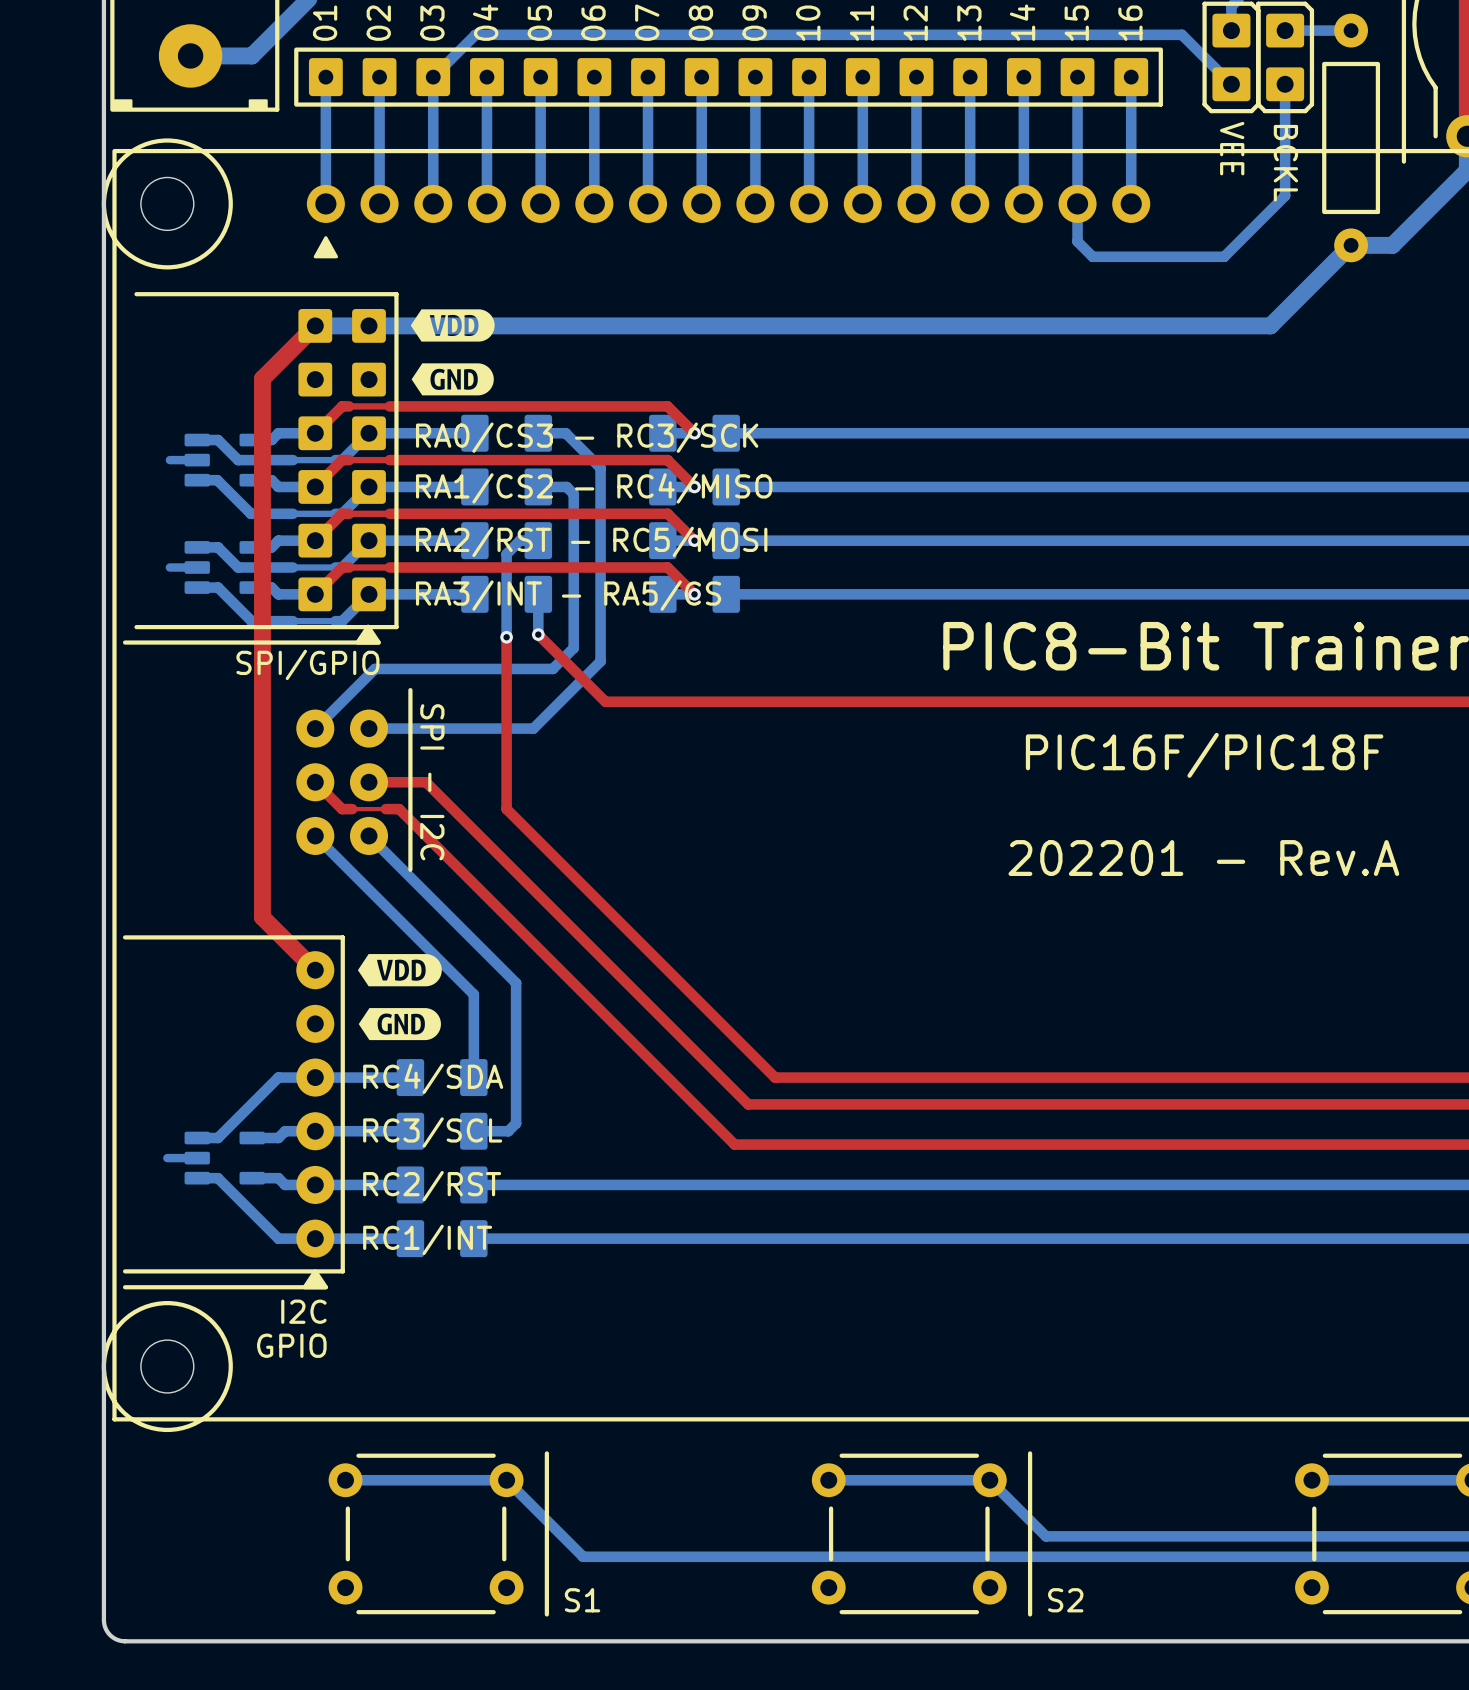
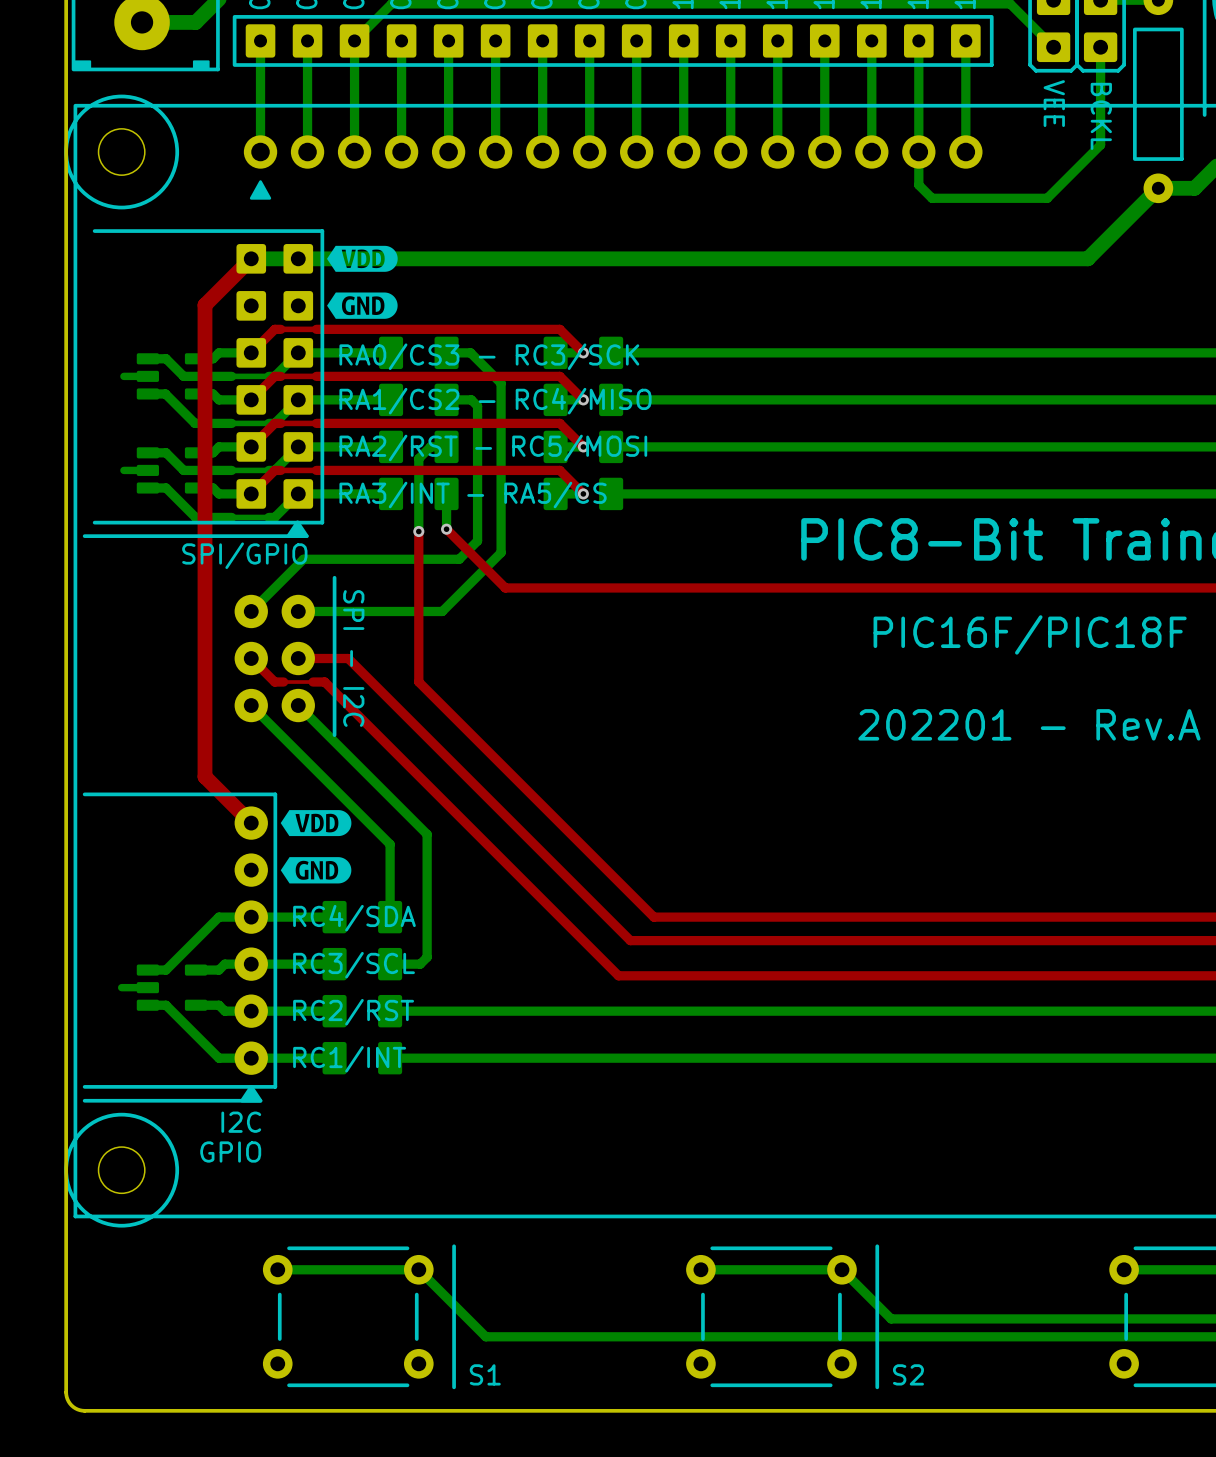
drawing shape: [410, 309, 495, 342] -> [327, 245, 398, 272]
drawing shape: [411, 363, 494, 396] -> [327, 292, 398, 319]
drawing shape: [357, 954, 442, 987] -> [280, 810, 352, 837]
drawing shape: [358, 1008, 441, 1041] -> [280, 857, 352, 884]

